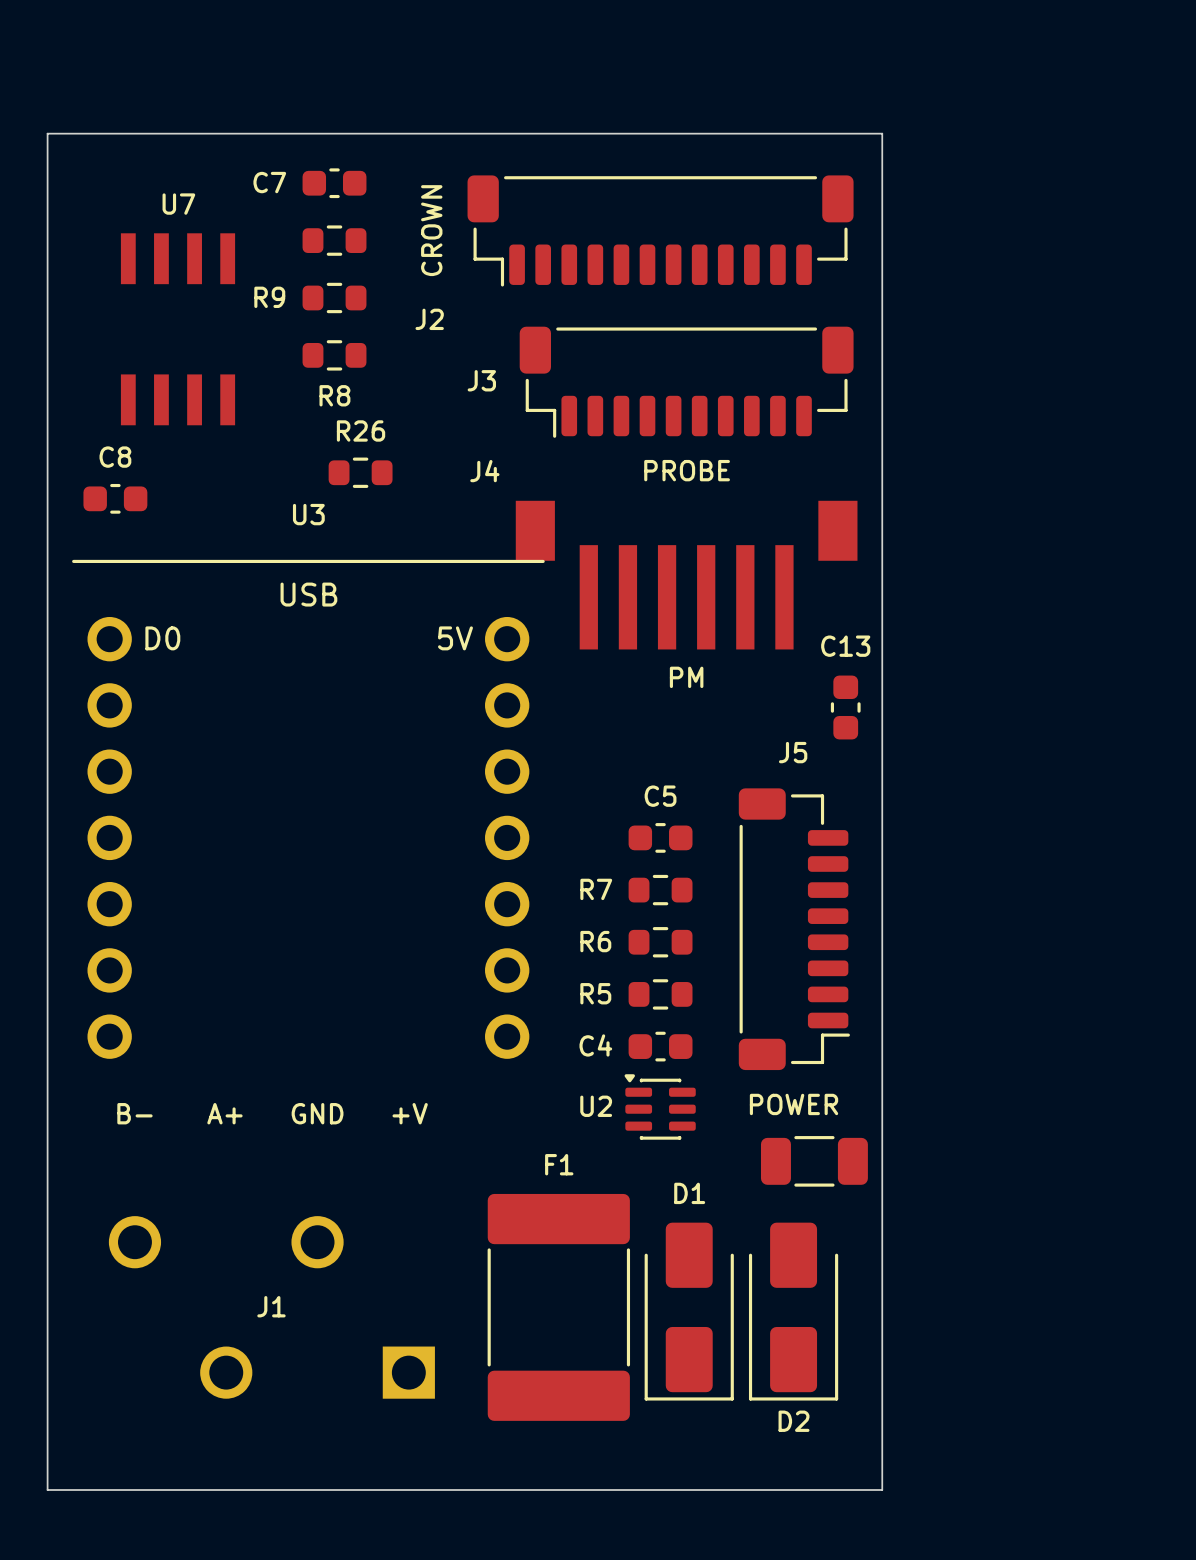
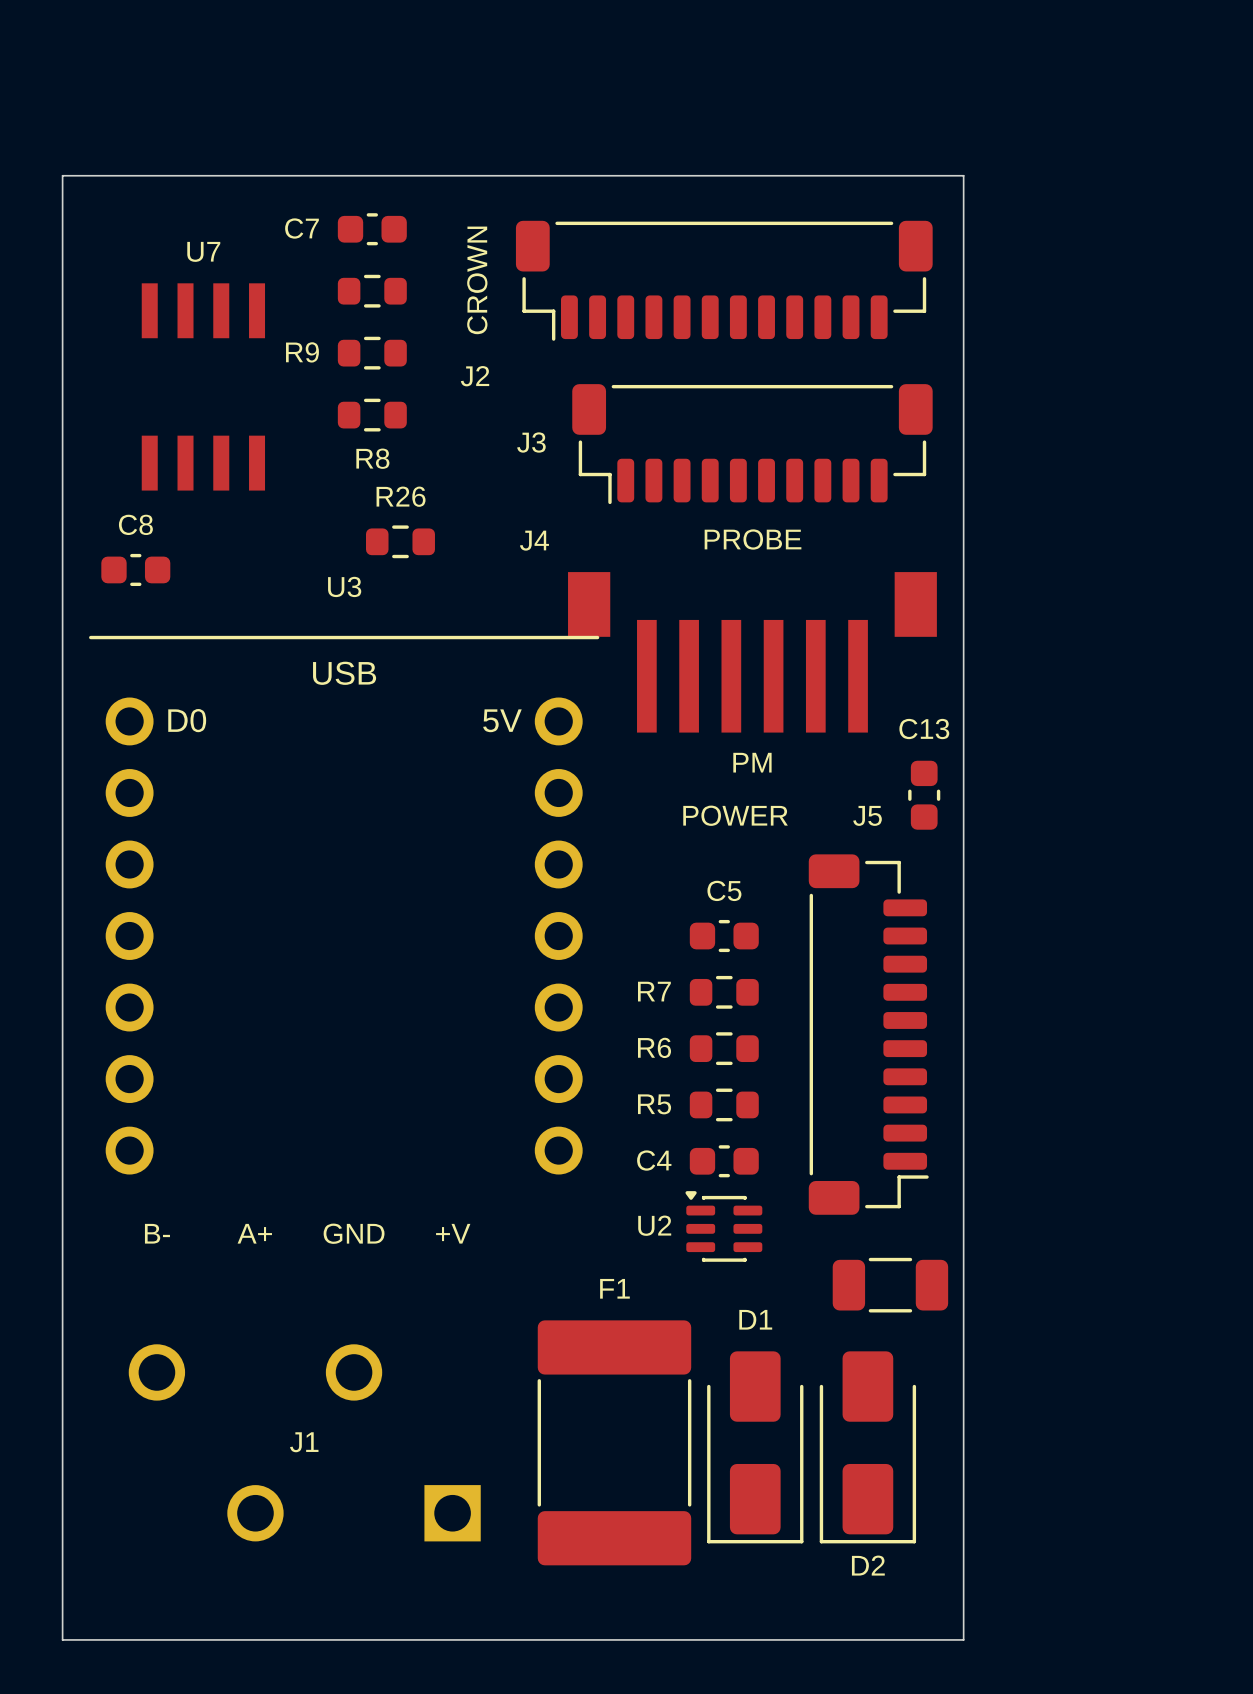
J5 footprint: [738, 788, 850, 1071] -> [808, 854, 929, 1215]
text position: POWER (794, 1104) -> POWER (735, 815)

